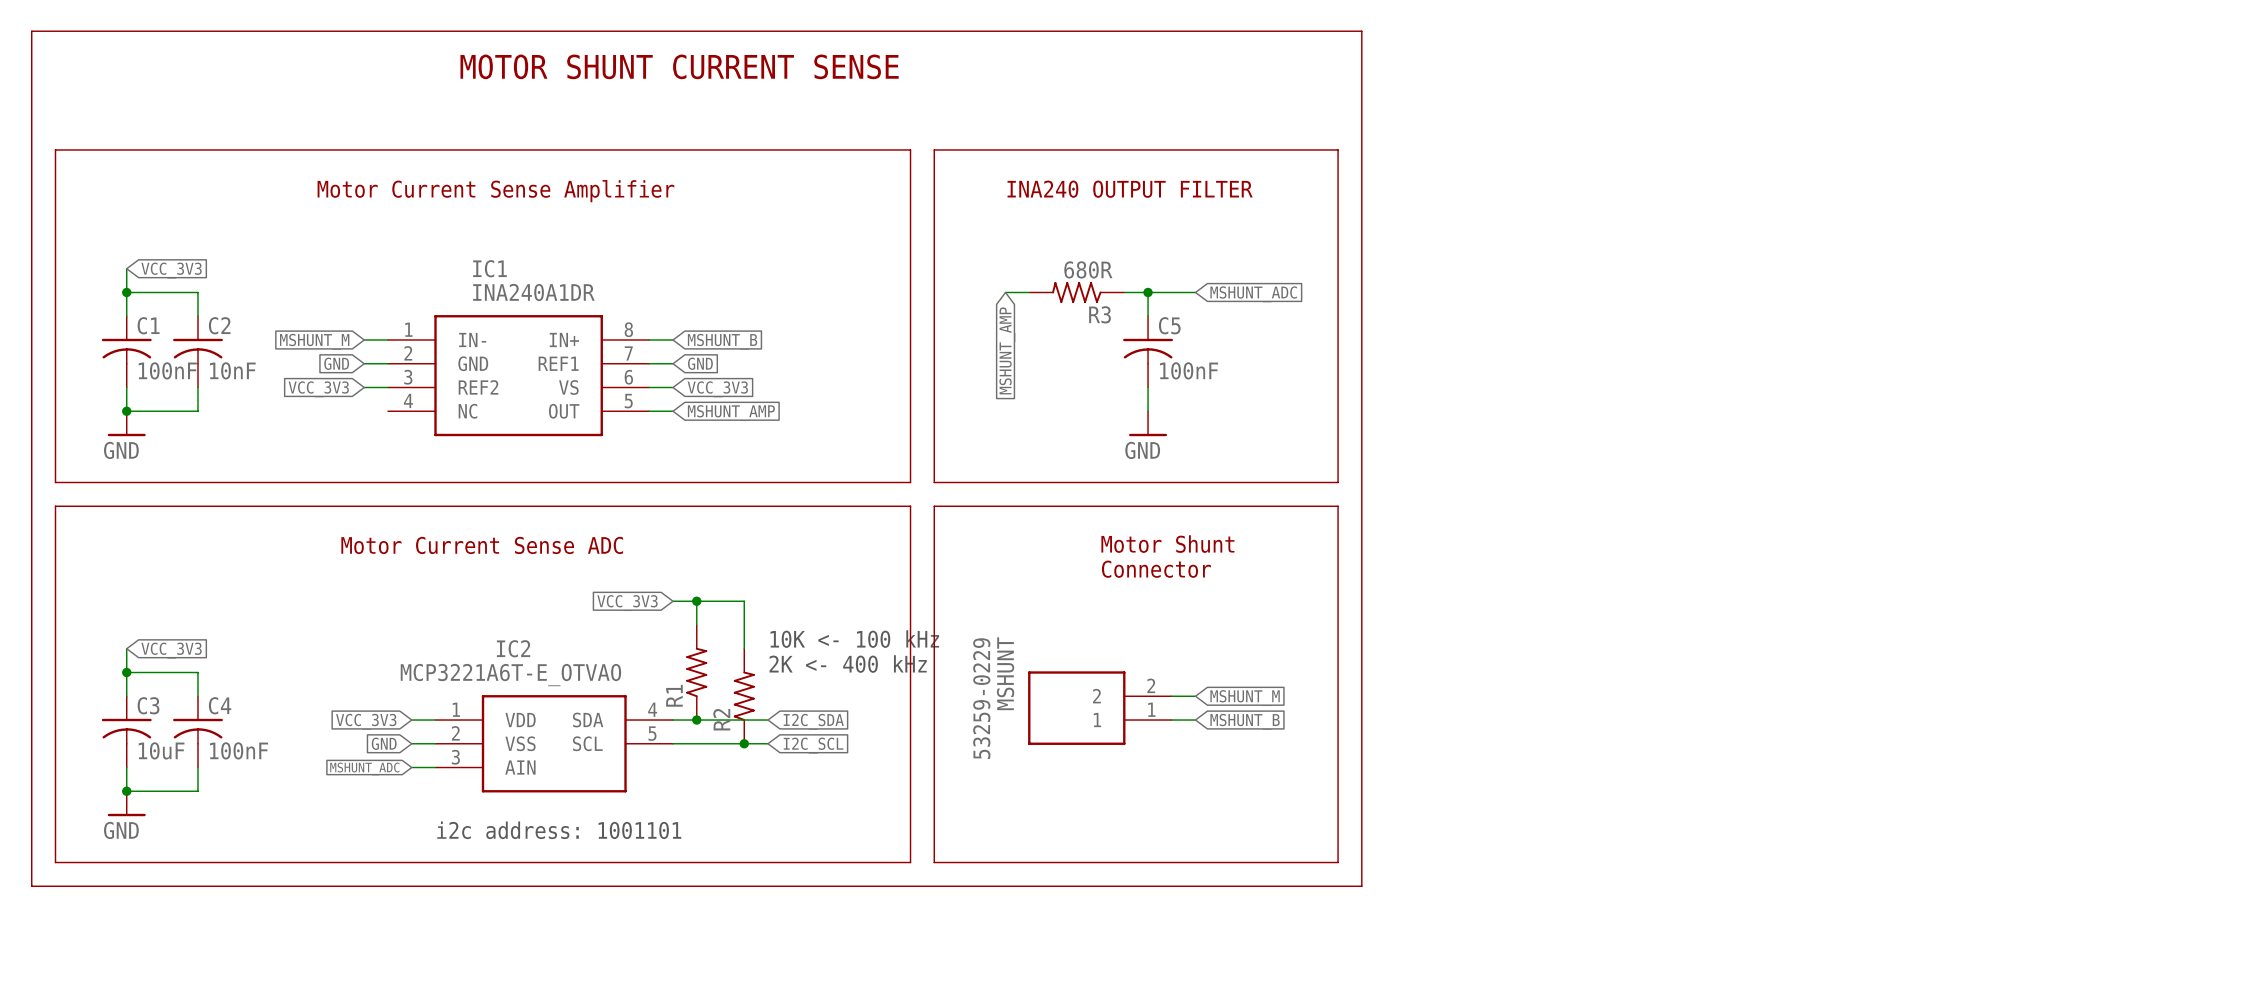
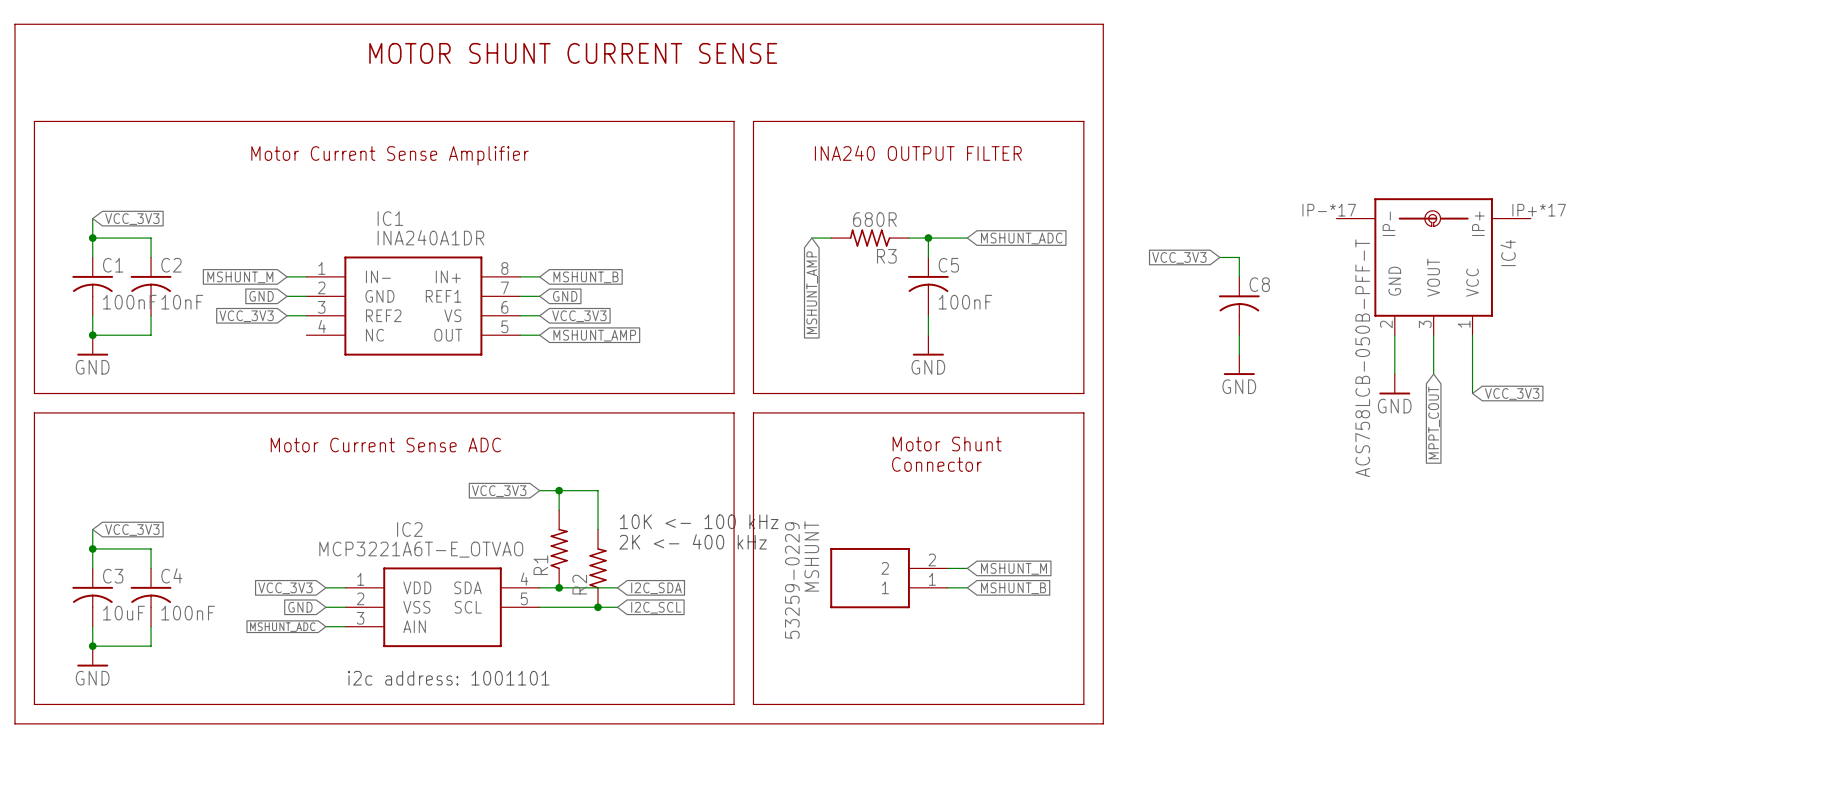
wire: none -> (1219, 257) (1239, 257) (1239, 276)
global label: none -> VCC_3V3 (1179, 257)
IC4: none -> ACS758LCB-050B-PFF-T (1433, 266)
C8: none -> (1239, 306)
wire: none -> (1239, 335) (1239, 354)
wire: none -> (1394, 335) (1394, 374)
wire: none -> (1433, 335) (1433, 374)
wire: none -> (1472, 335) (1472, 393)
power symbol: none -> GND (1239, 364)
power symbol: none -> GND (1394, 384)
global label: none -> VCC_3V3 (1512, 393)
global label: none -> MPPT_COUT (1434, 422)

